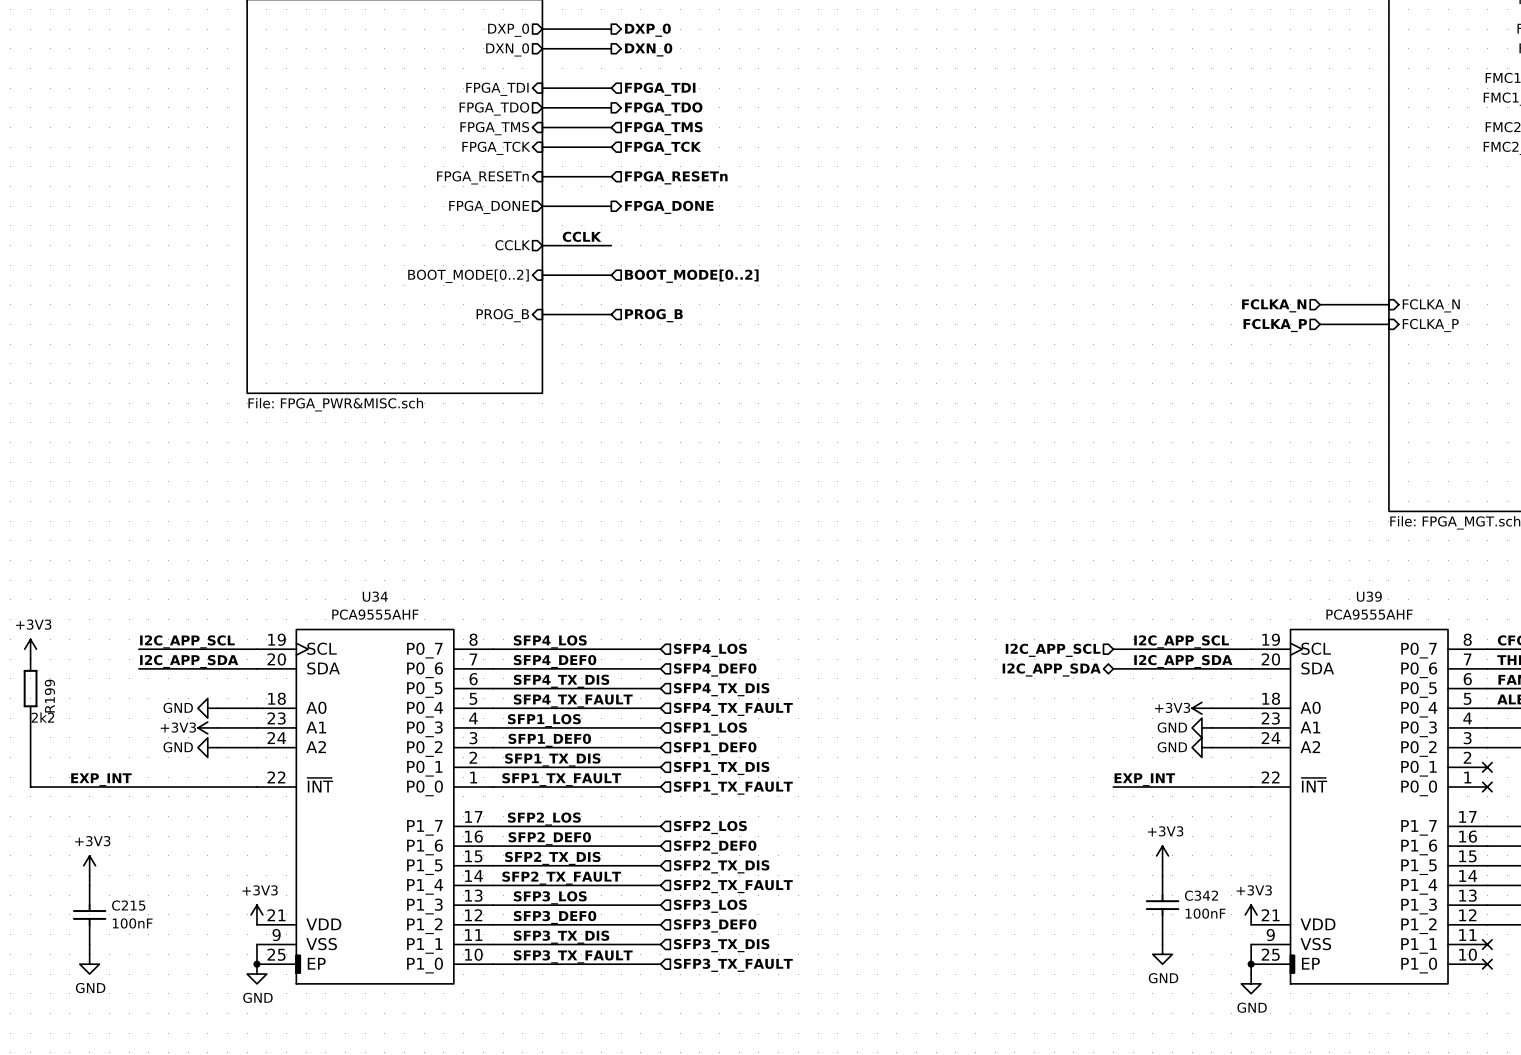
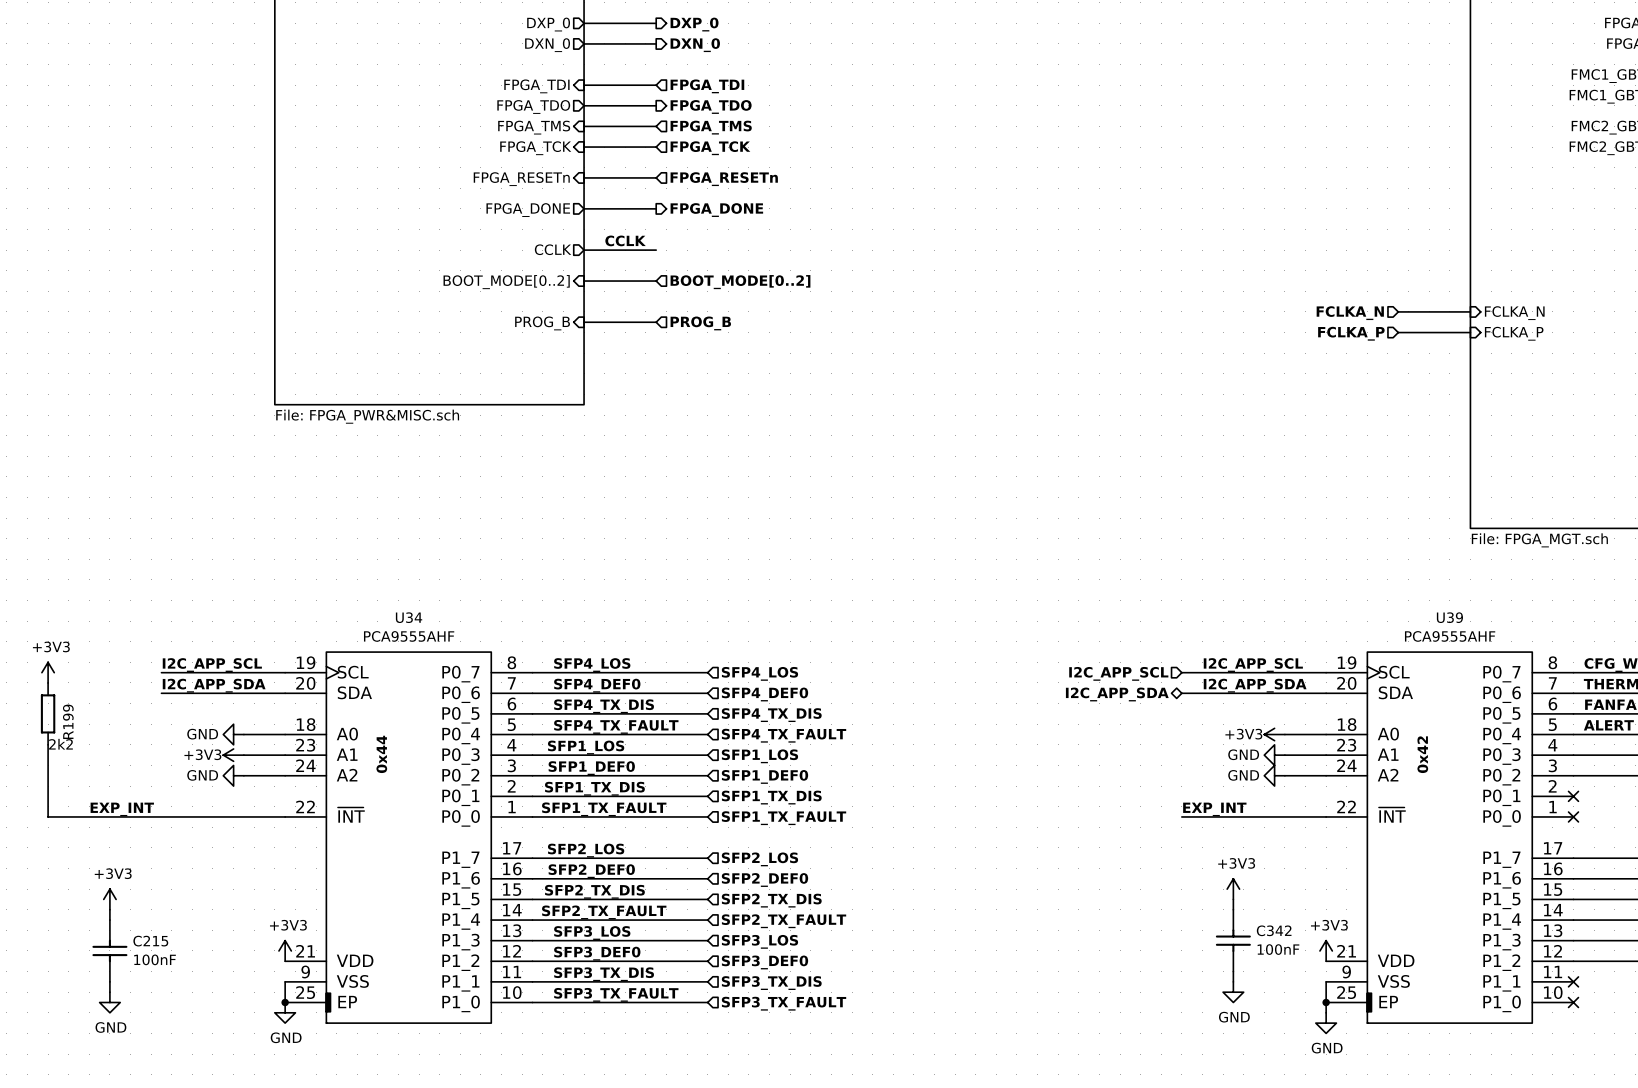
text: none -> 0x44 (381, 754)
text: none -> 0x42 (1422, 754)

